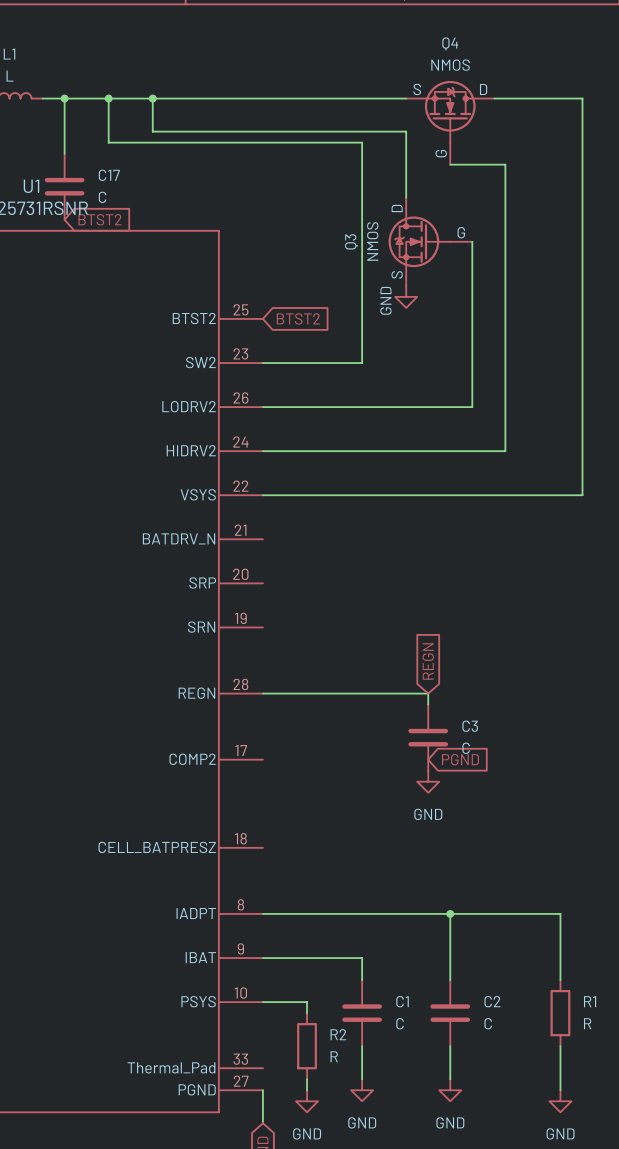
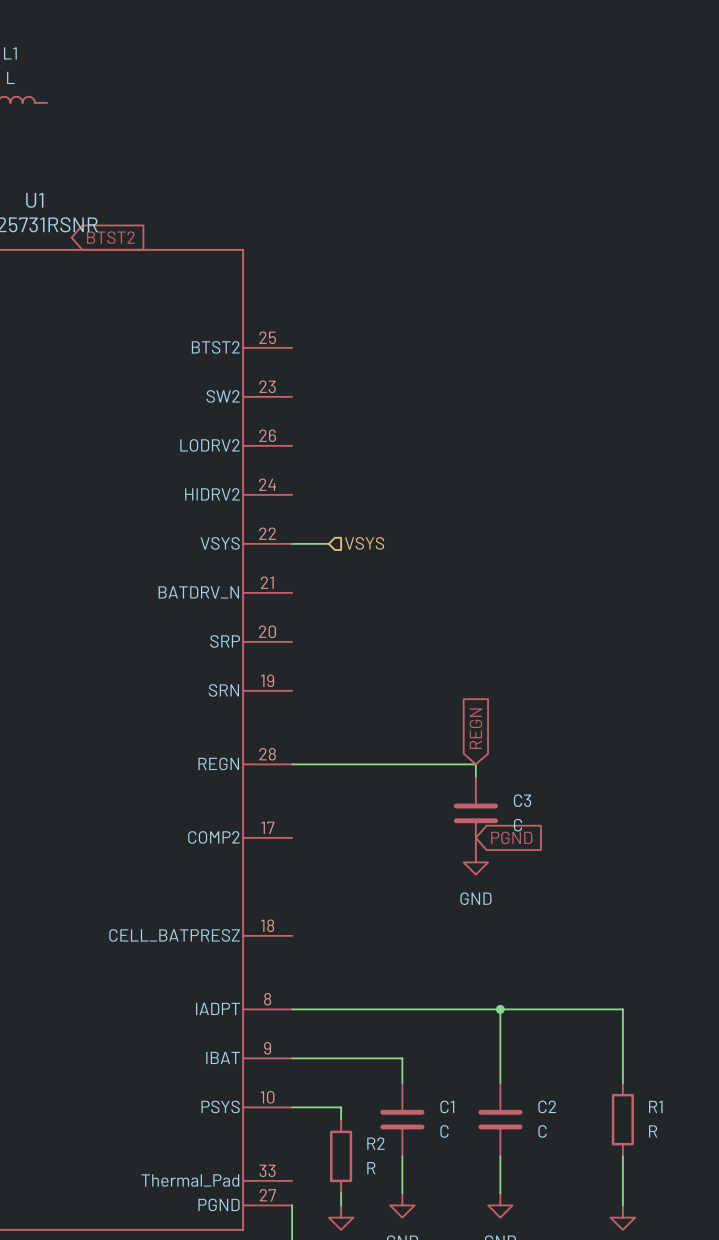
wire: (42, 98) (406, 98) -> none
wire: (64, 98) (64, 153) -> none
junction: (64, 98) -> none
wire: (108, 98) (108, 142) (362, 142) (362, 363) (262, 363) -> none
junction: (108, 98) -> none
wire: (152, 98) (152, 131) (406, 131) (406, 197) -> none
junction: (152, 98) -> none
wire: (494, 98) (582, 98) (582, 495) (296, 495) -> none
Q4: NMOS (450, 122) -> none
wire: (450, 164) (505, 164) (505, 451) (262, 451) -> none
C17: C (64, 186) -> none
Q3: NMOS (430, 241) -> none
wire: (472, 241) (472, 407) (262, 407) -> none
power symbol: GND (406, 296) -> none
global label: BTST2 (298, 318) -> none
hierarchical label: none -> VSYS (364, 543)

